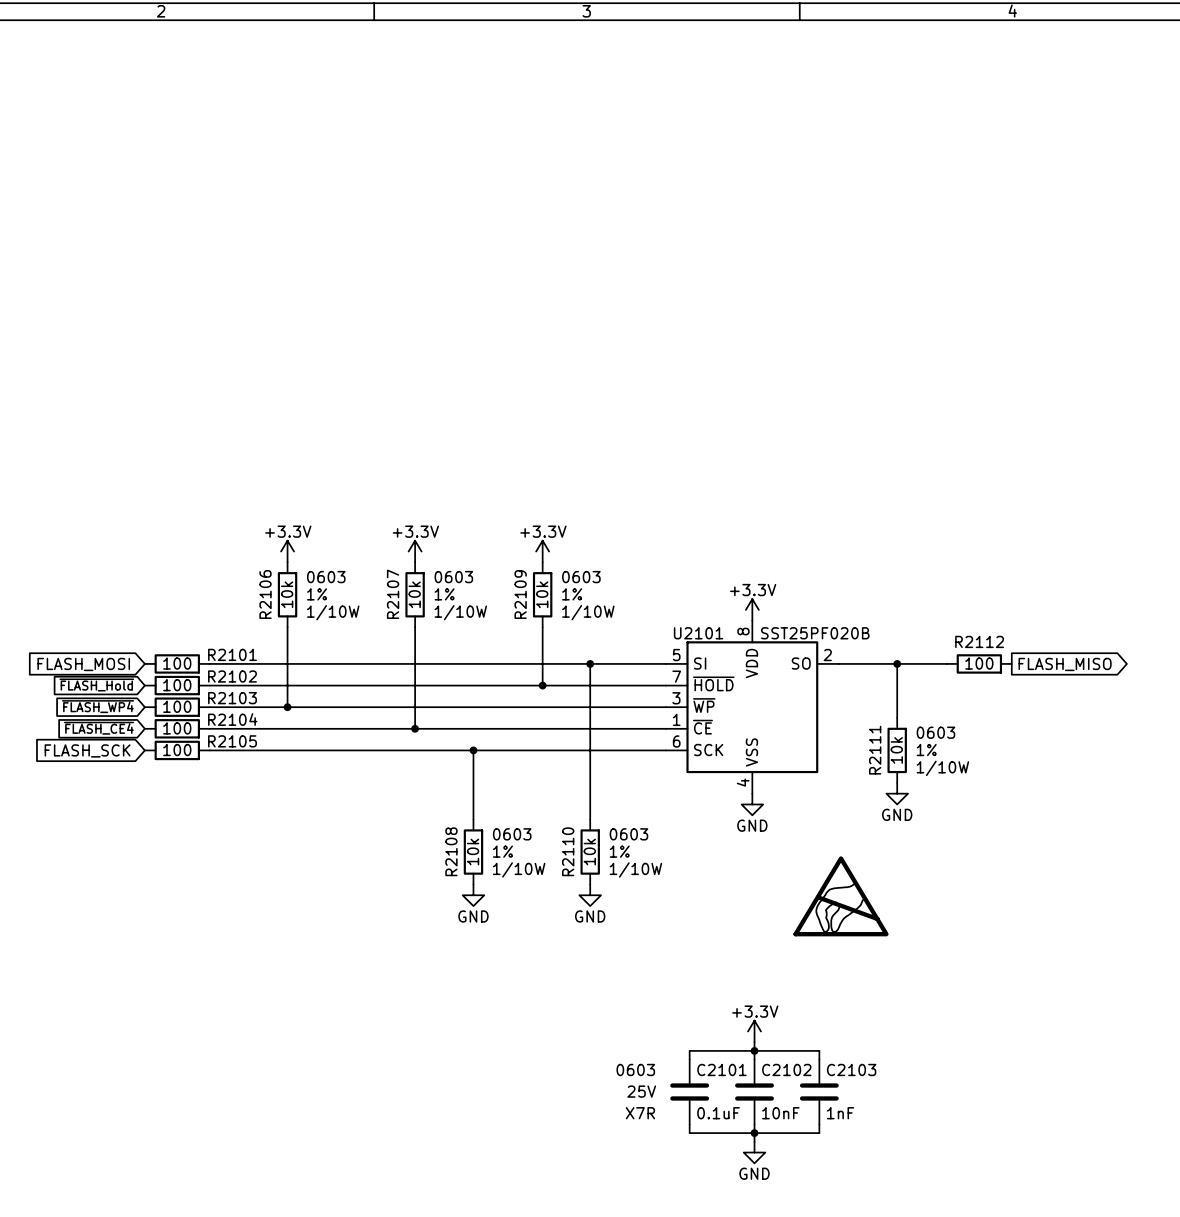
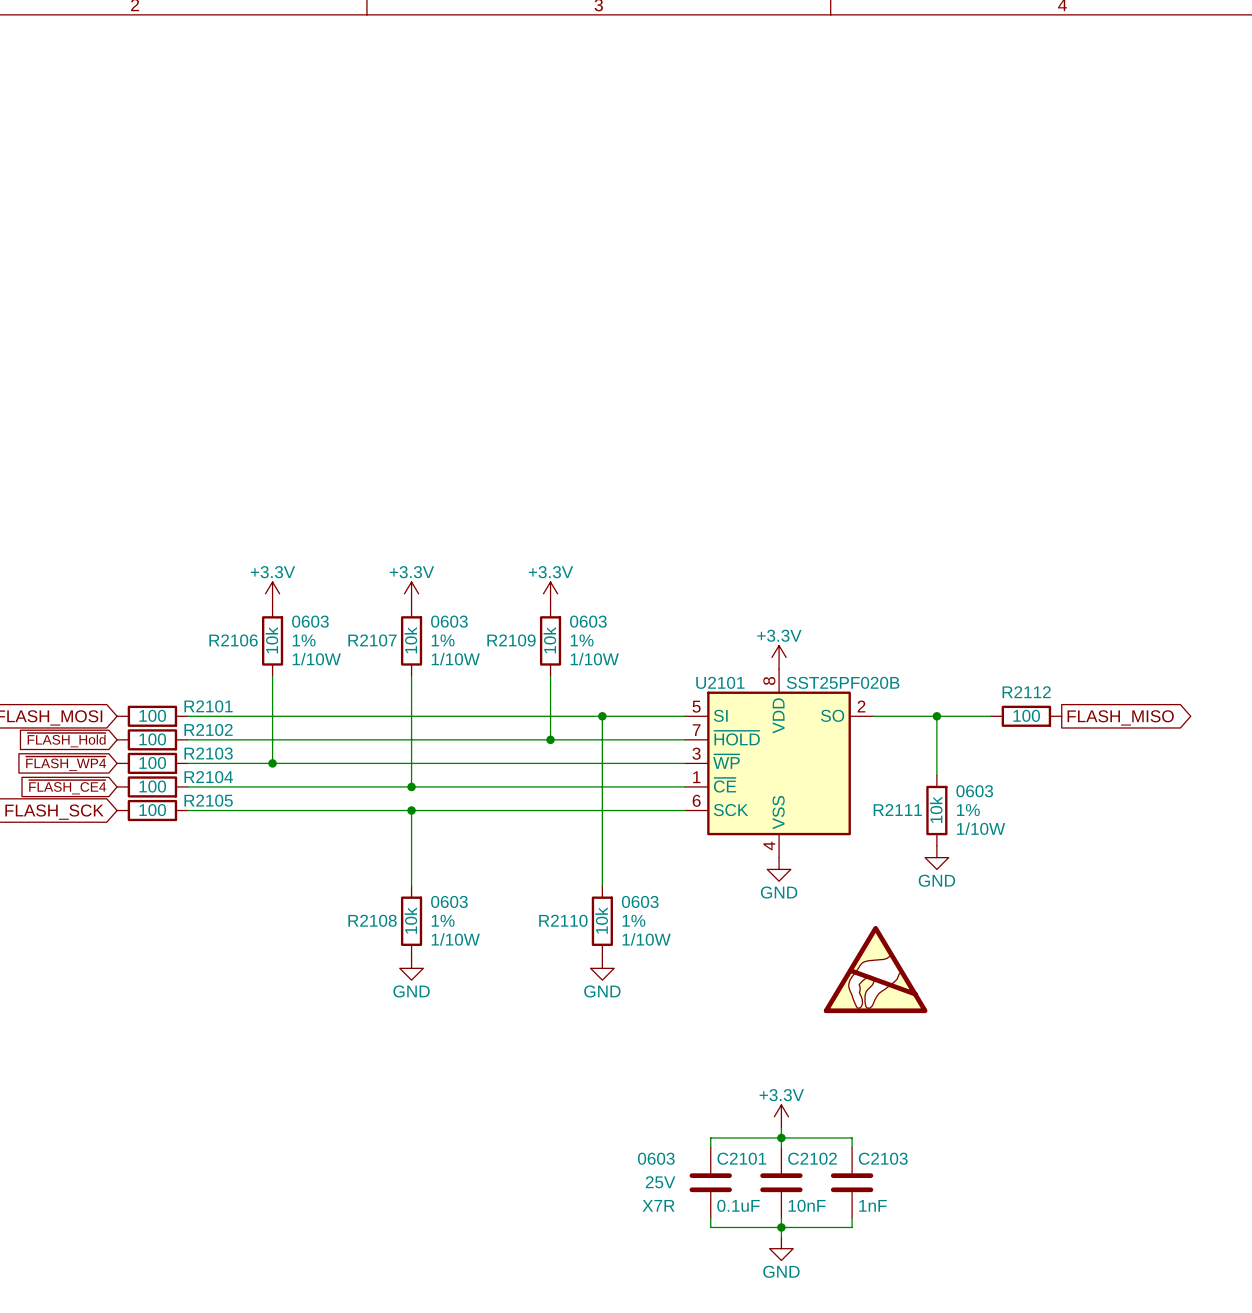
R2106 name rotation: 0° (265, 594) -> 90° clockwise (233, 640)
R2107 name rotation: 0° (393, 594) -> 90° clockwise (372, 640)
R2109 name rotation: 0° (520, 594) -> 90° clockwise (511, 640)
junction: none -> (411, 810)
wire: (473, 750) (473, 819) -> (411, 810) (411, 885)
junction: (473, 750) -> none
R2111 name rotation: 0° (875, 750) -> 90° clockwise (897, 809)
R2108 name rotation: 0° (451, 851) -> 90° clockwise (372, 920)
R2110 name rotation: 0° (568, 851) -> 90° clockwise (563, 920)
R2108 position: (473, 852) -> (411, 921)
power symbol position: GND (473, 895) -> GND (411, 968)

